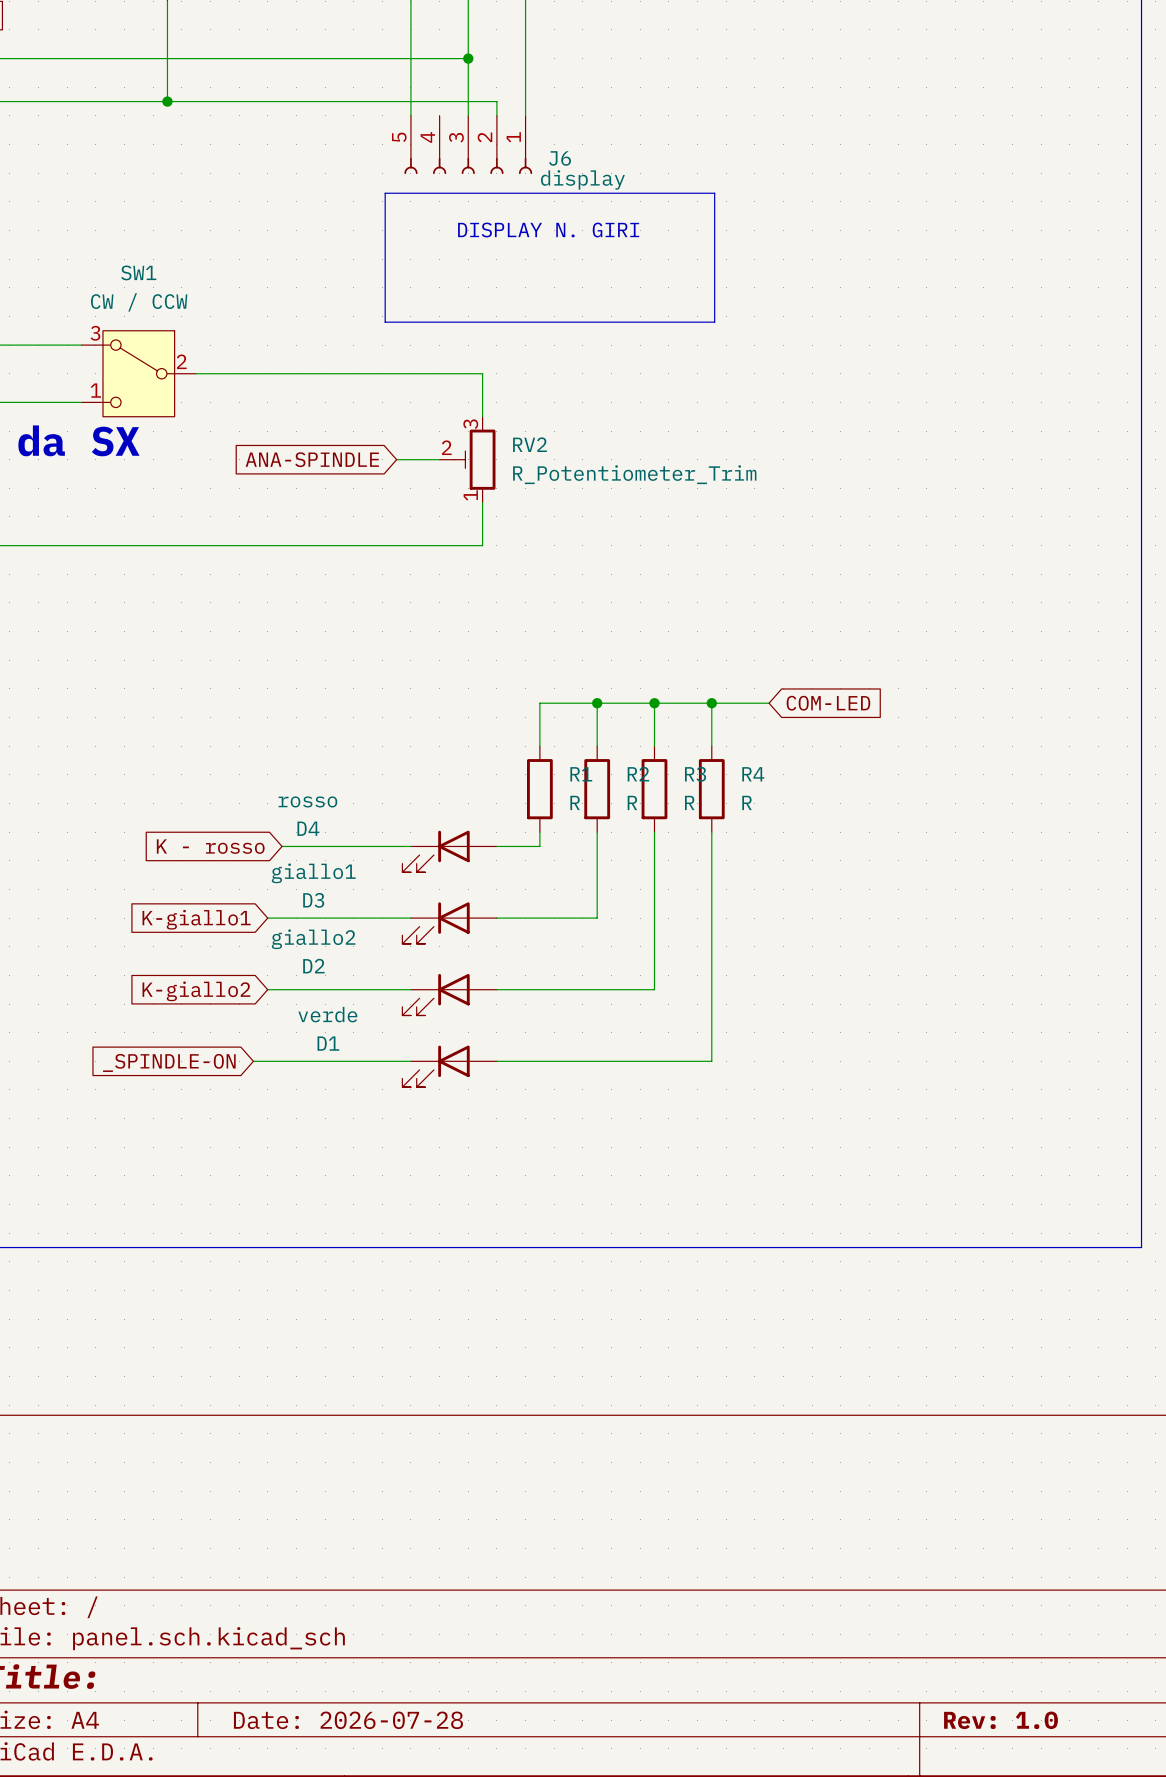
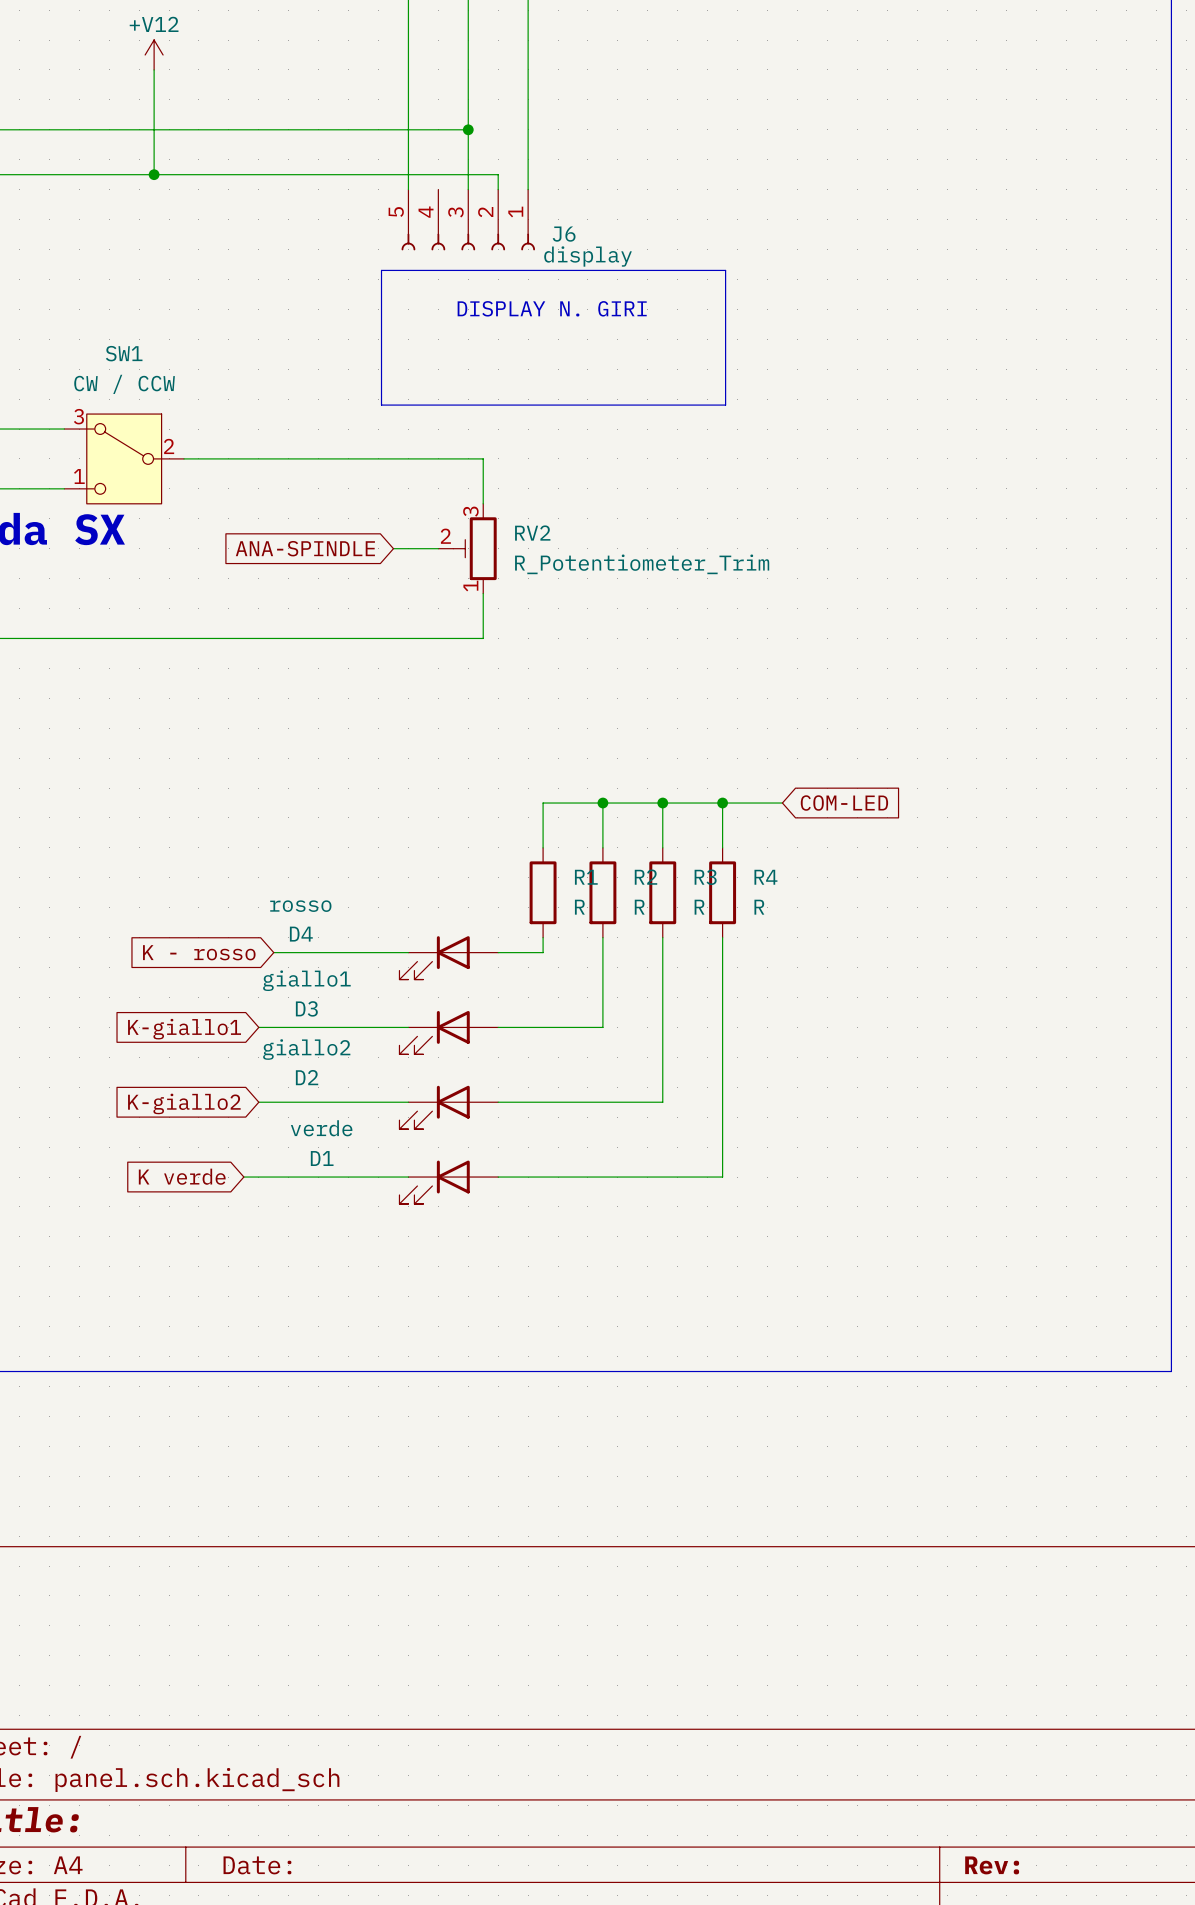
global label: _SPINDLE-ON (169, 1062) -> K verde (182, 1176)
title block: Date: 2026-07-28 (348, 1720) -> Date: (257, 1865)
title block: Rev: 1.0 (1000, 1720) -> Rev: (992, 1865)

